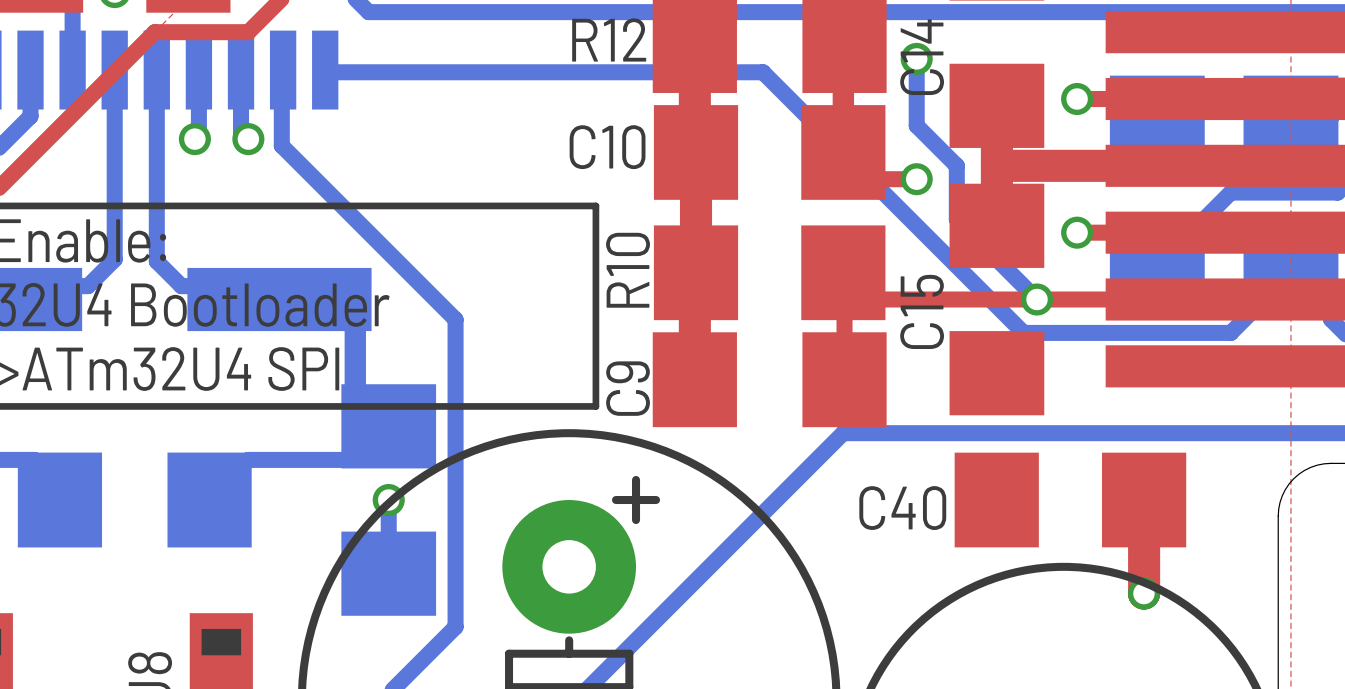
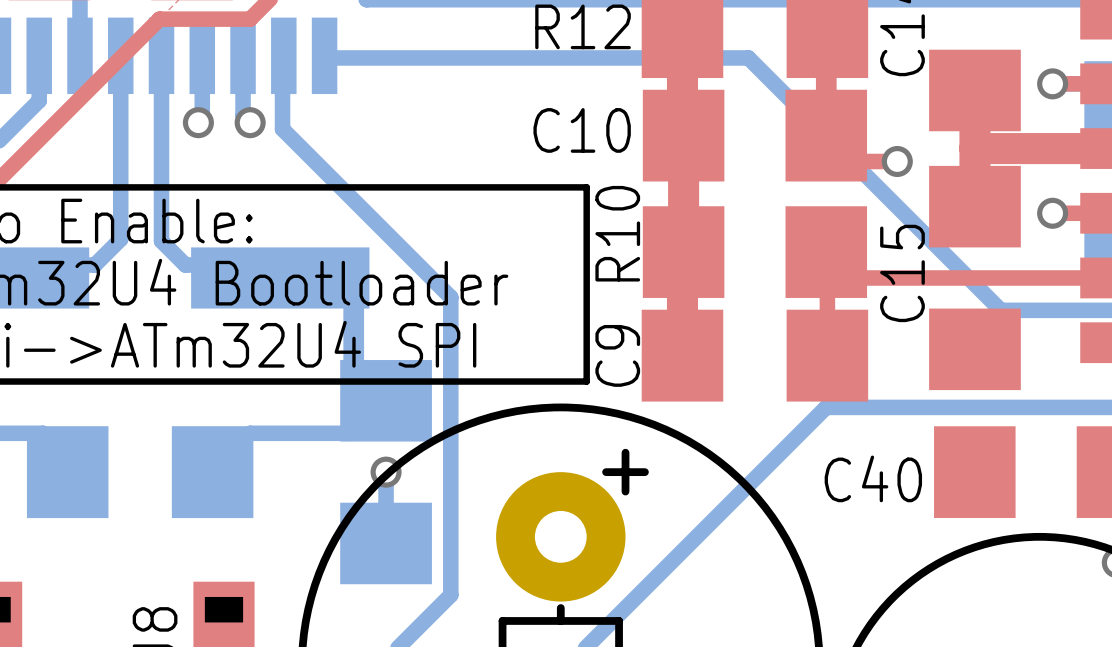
bottom track: (916, 58) (916, 125) (956, 165) (956, 219) (1037, 299) -> none
via: (916, 58) -> none
via: (1037, 299) -> none

